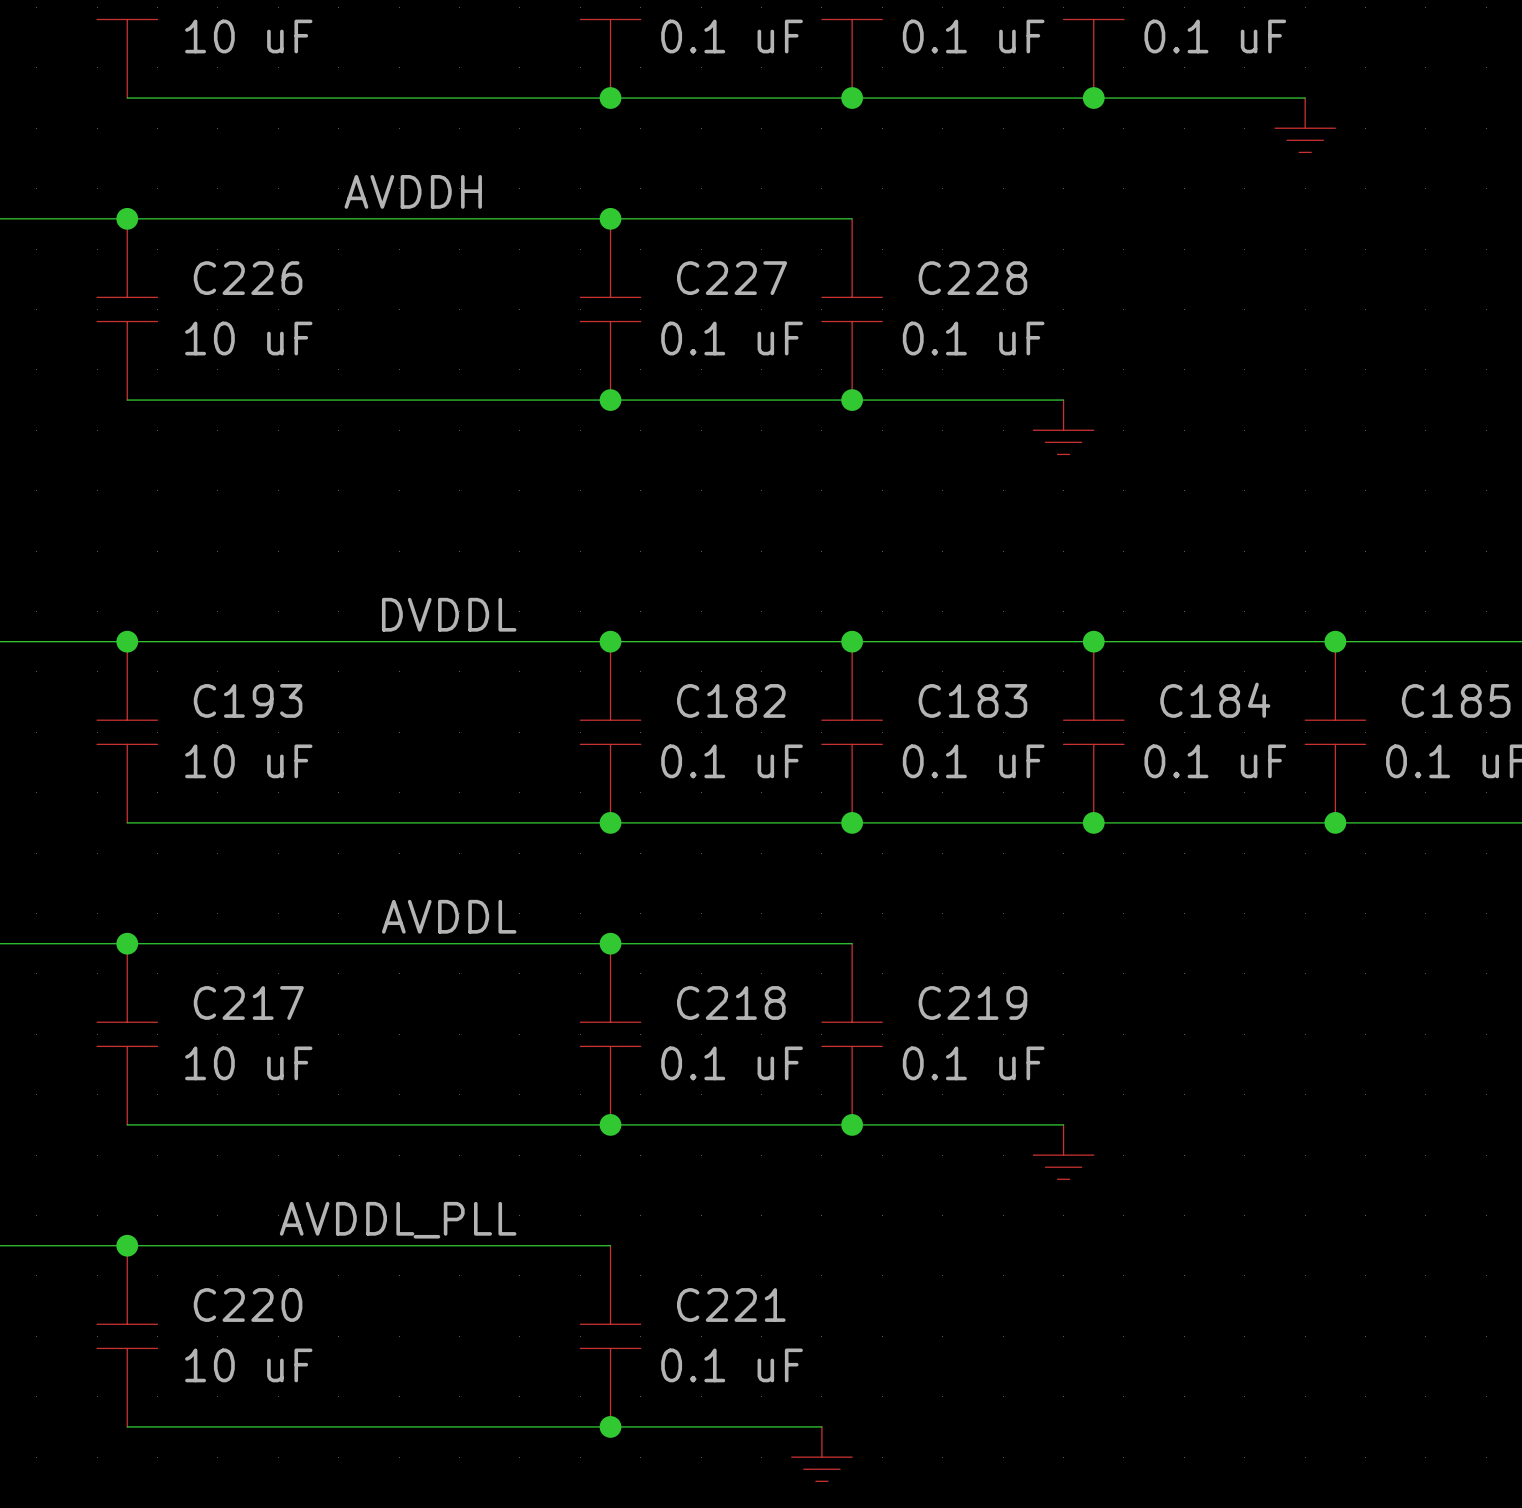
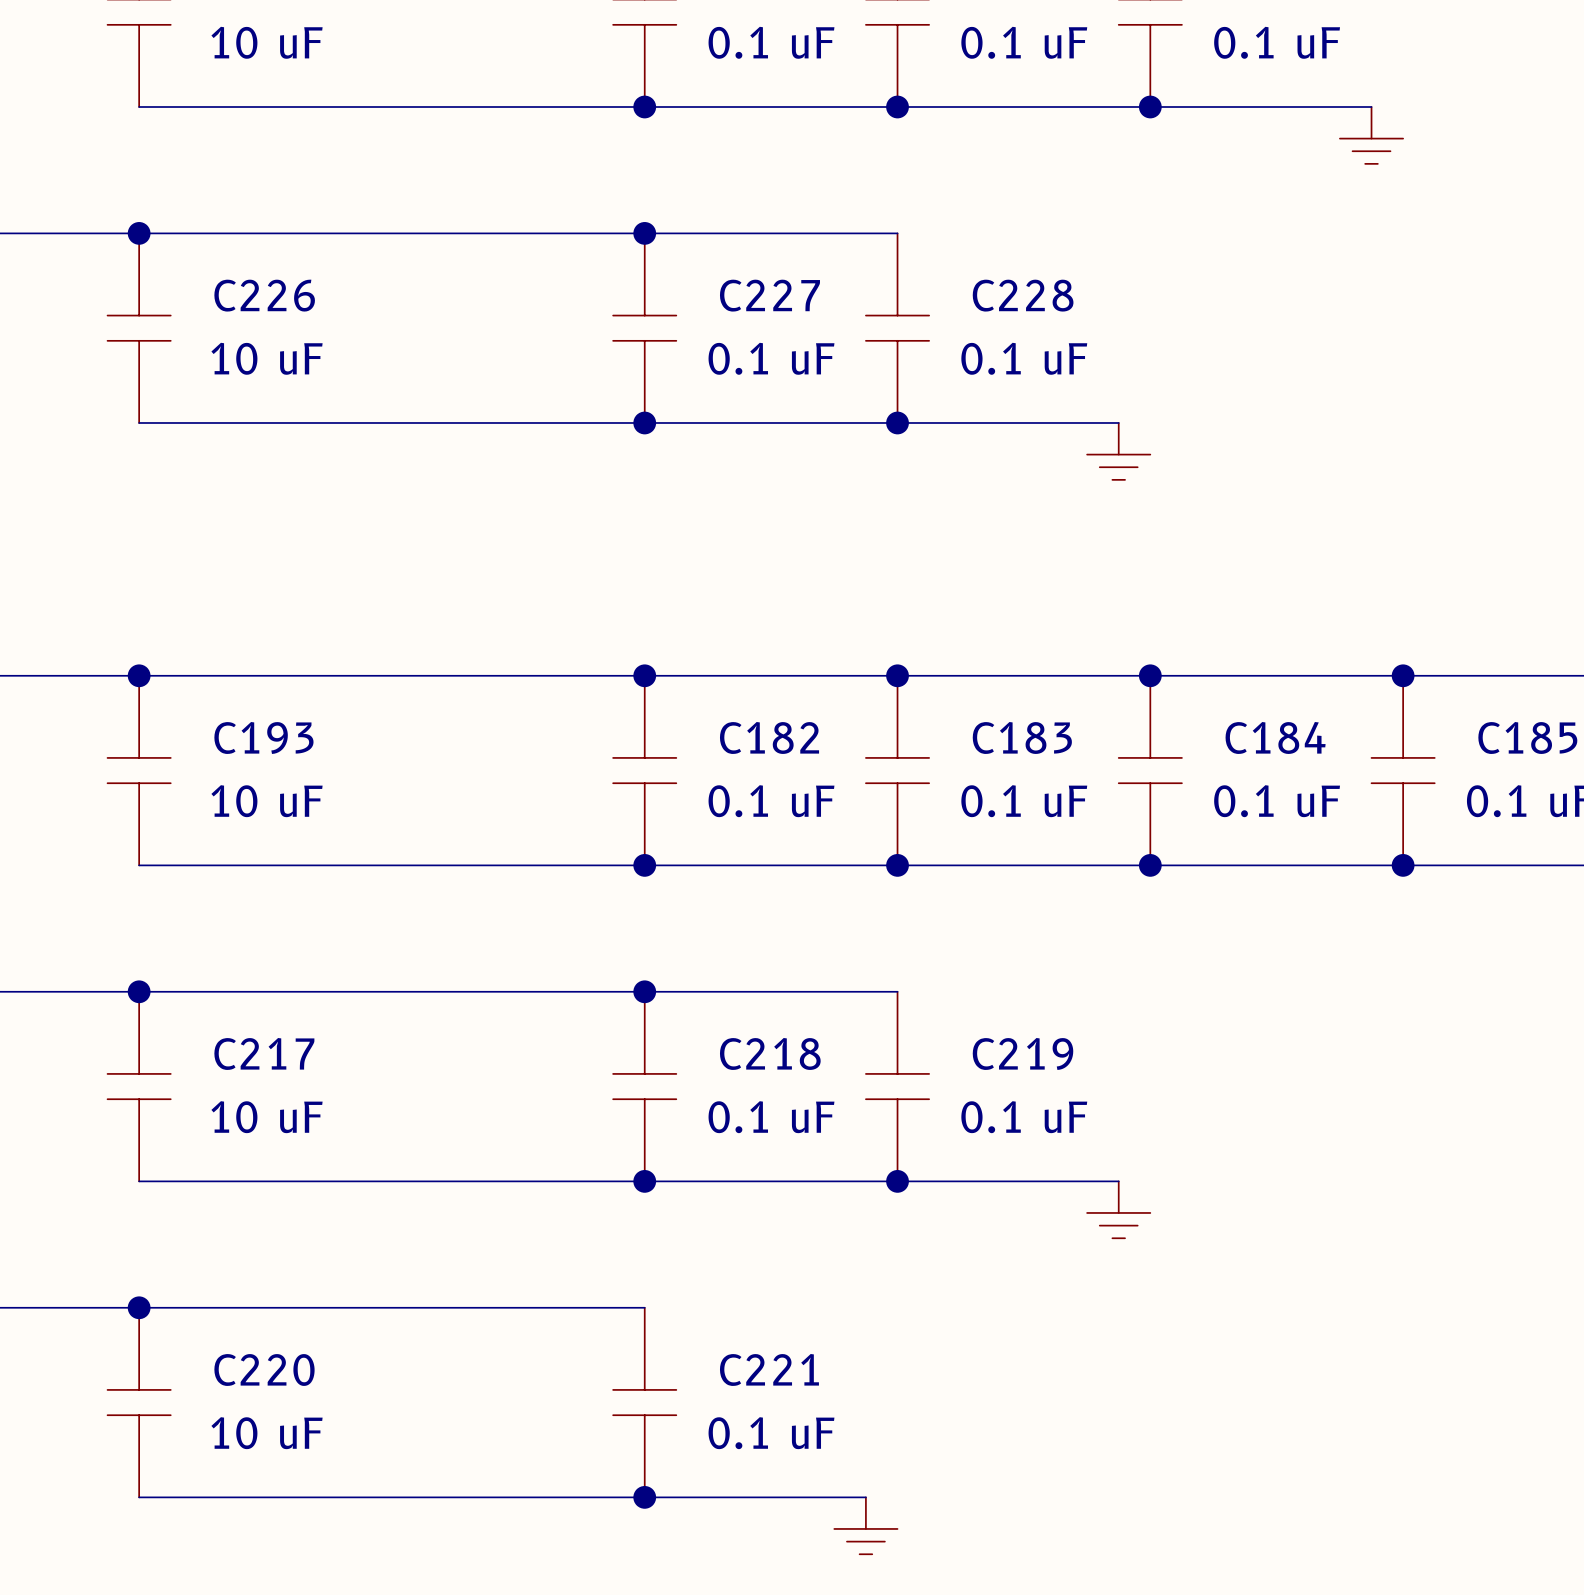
label: AVDDH (413, 191) -> none
label: DVDDL (449, 614) -> none
label: AVDDL (449, 916) -> none
label: AVDDL_PLL (398, 1220) -> none

